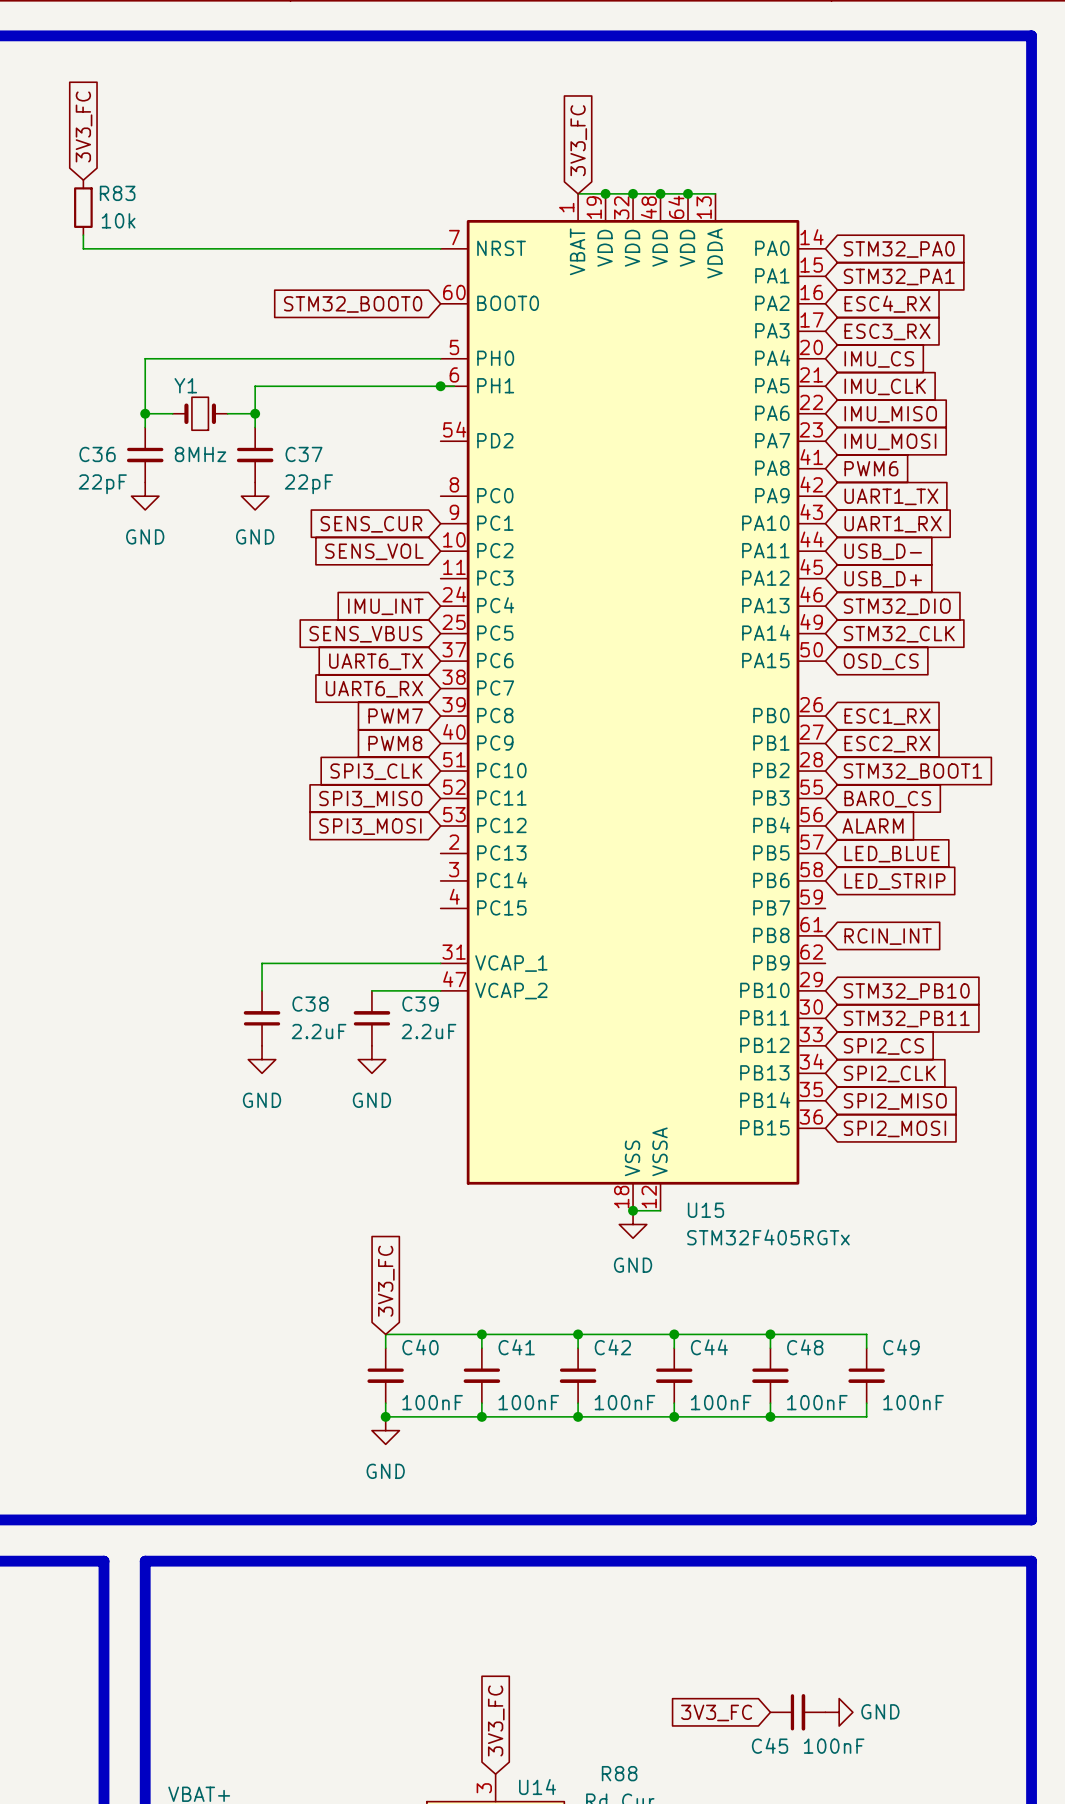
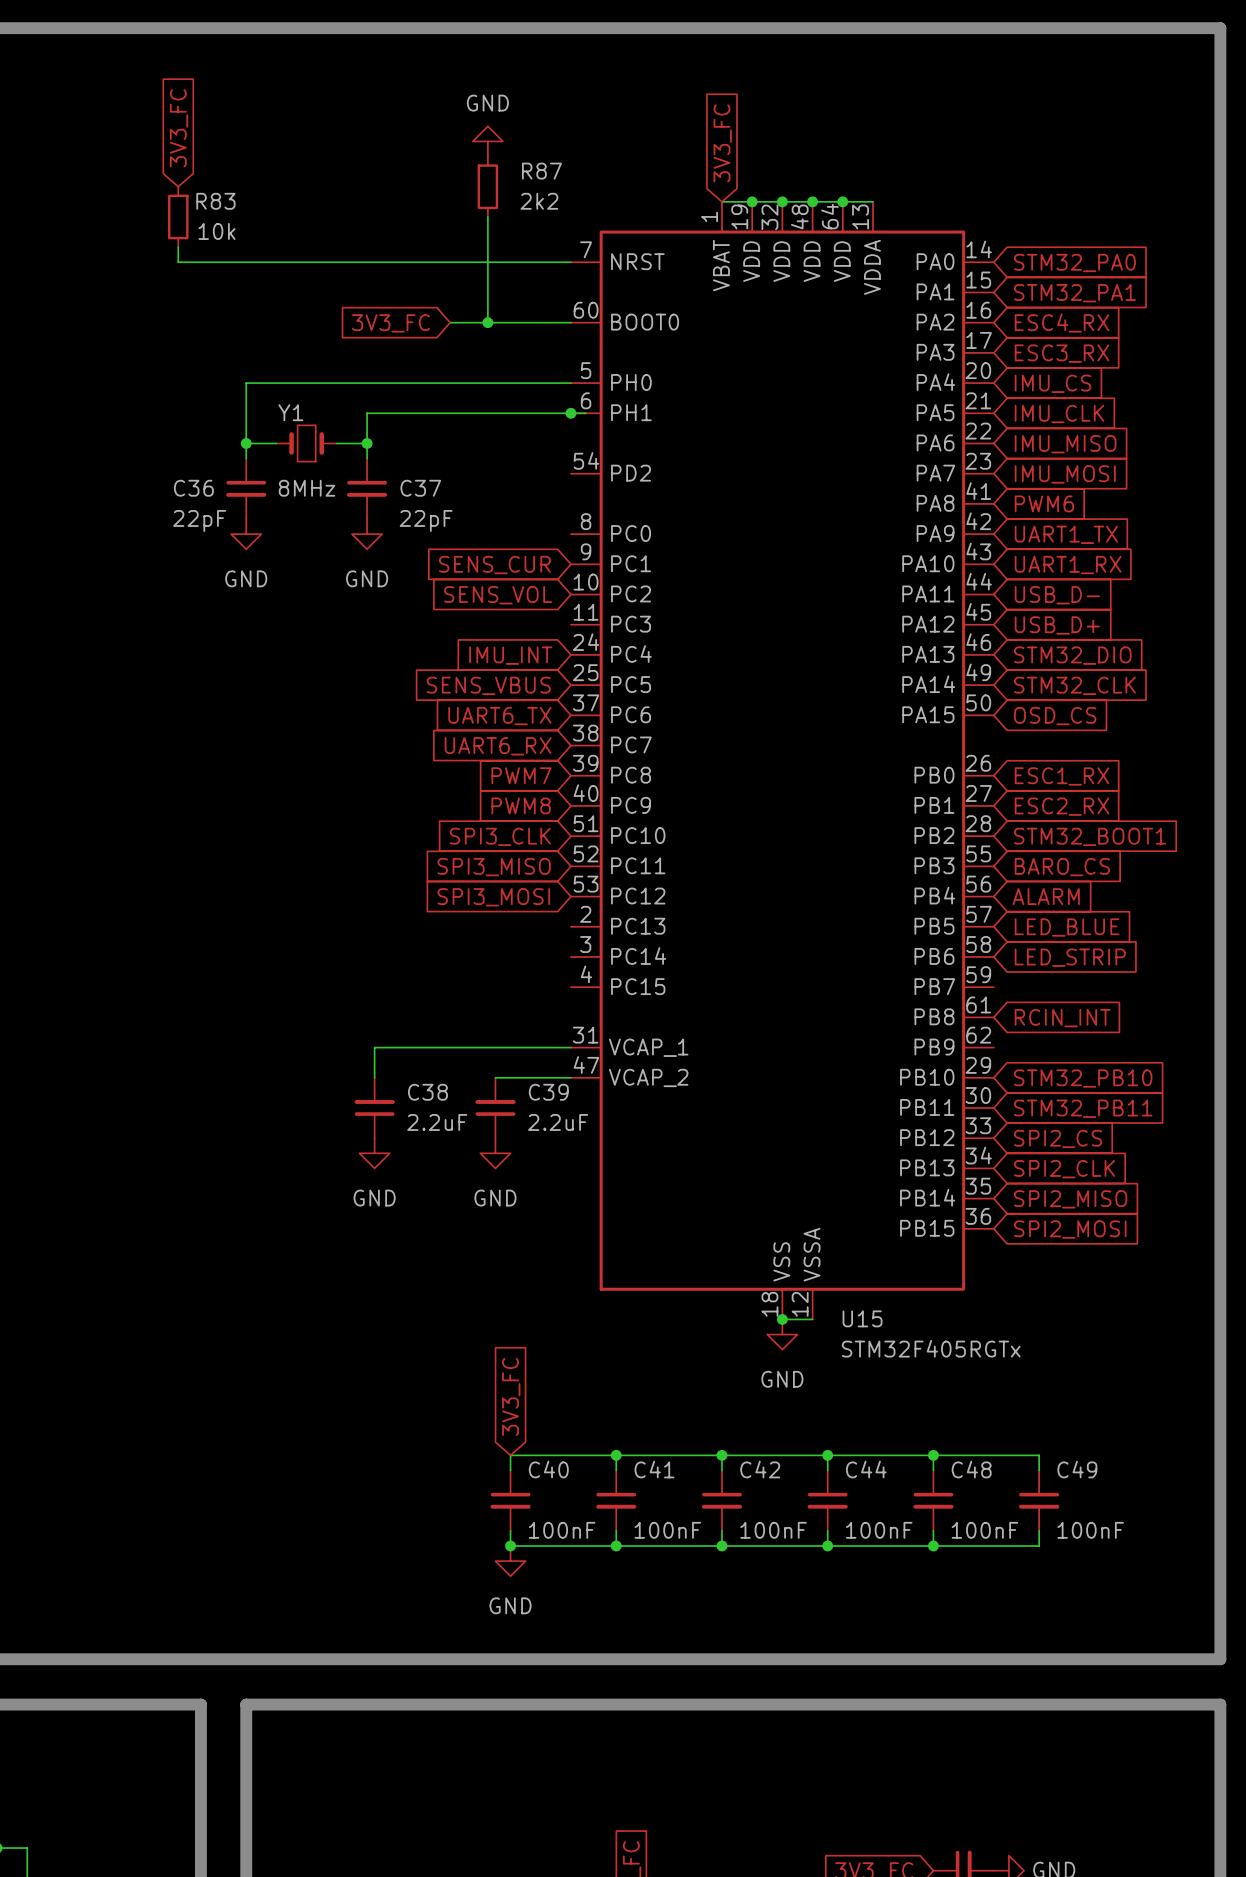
power symbol: none -> GND (487, 141)
R87: none -> 2k2 (487, 186)
wire: none -> (487, 216) (487, 322)
wire: none -> (450, 322) (570, 322)
junction: none -> (487, 322)
global label: none -> 3V3_FC (390, 323)
global label: STM32_BOOT0 (353, 304) -> none

